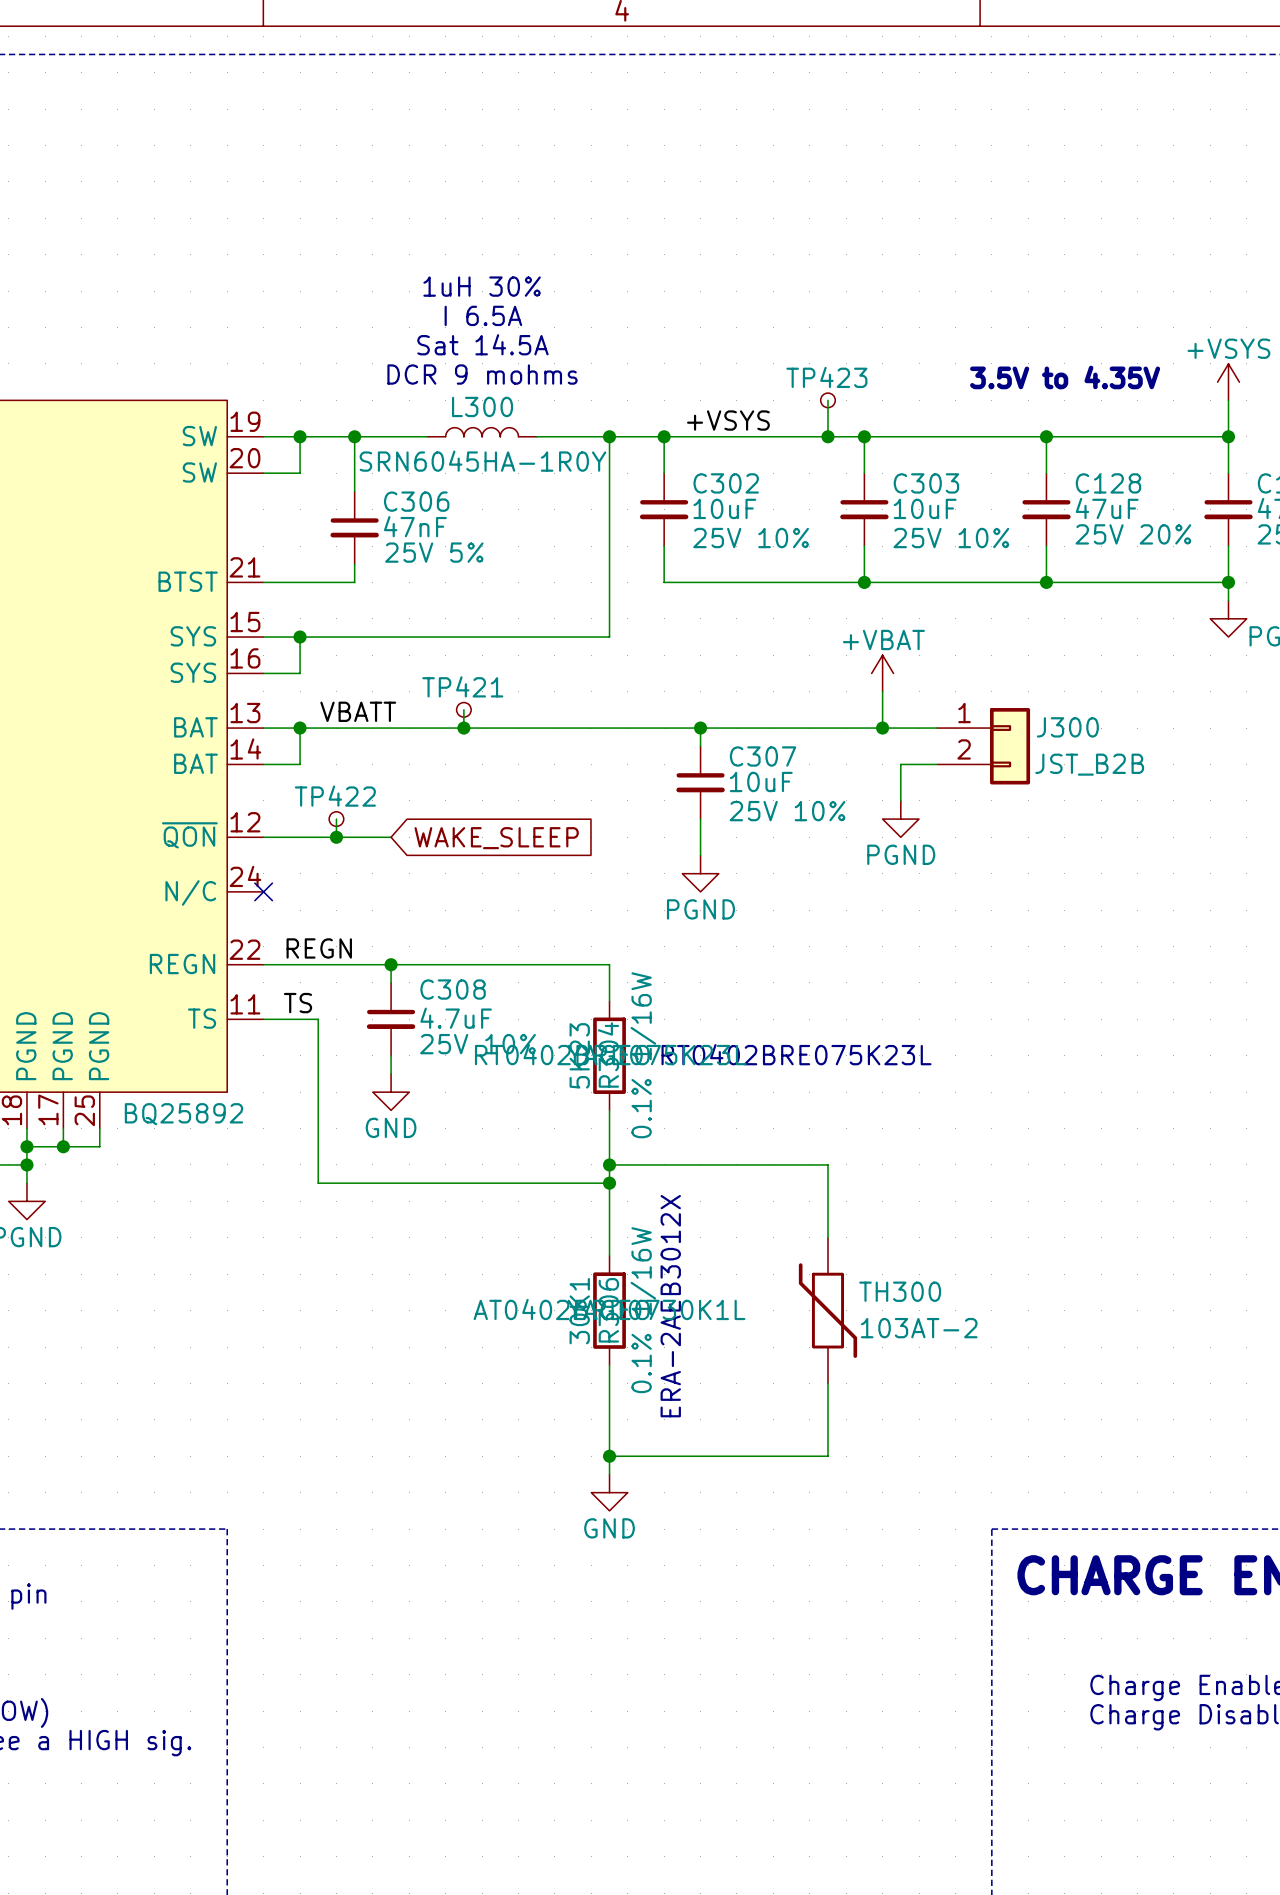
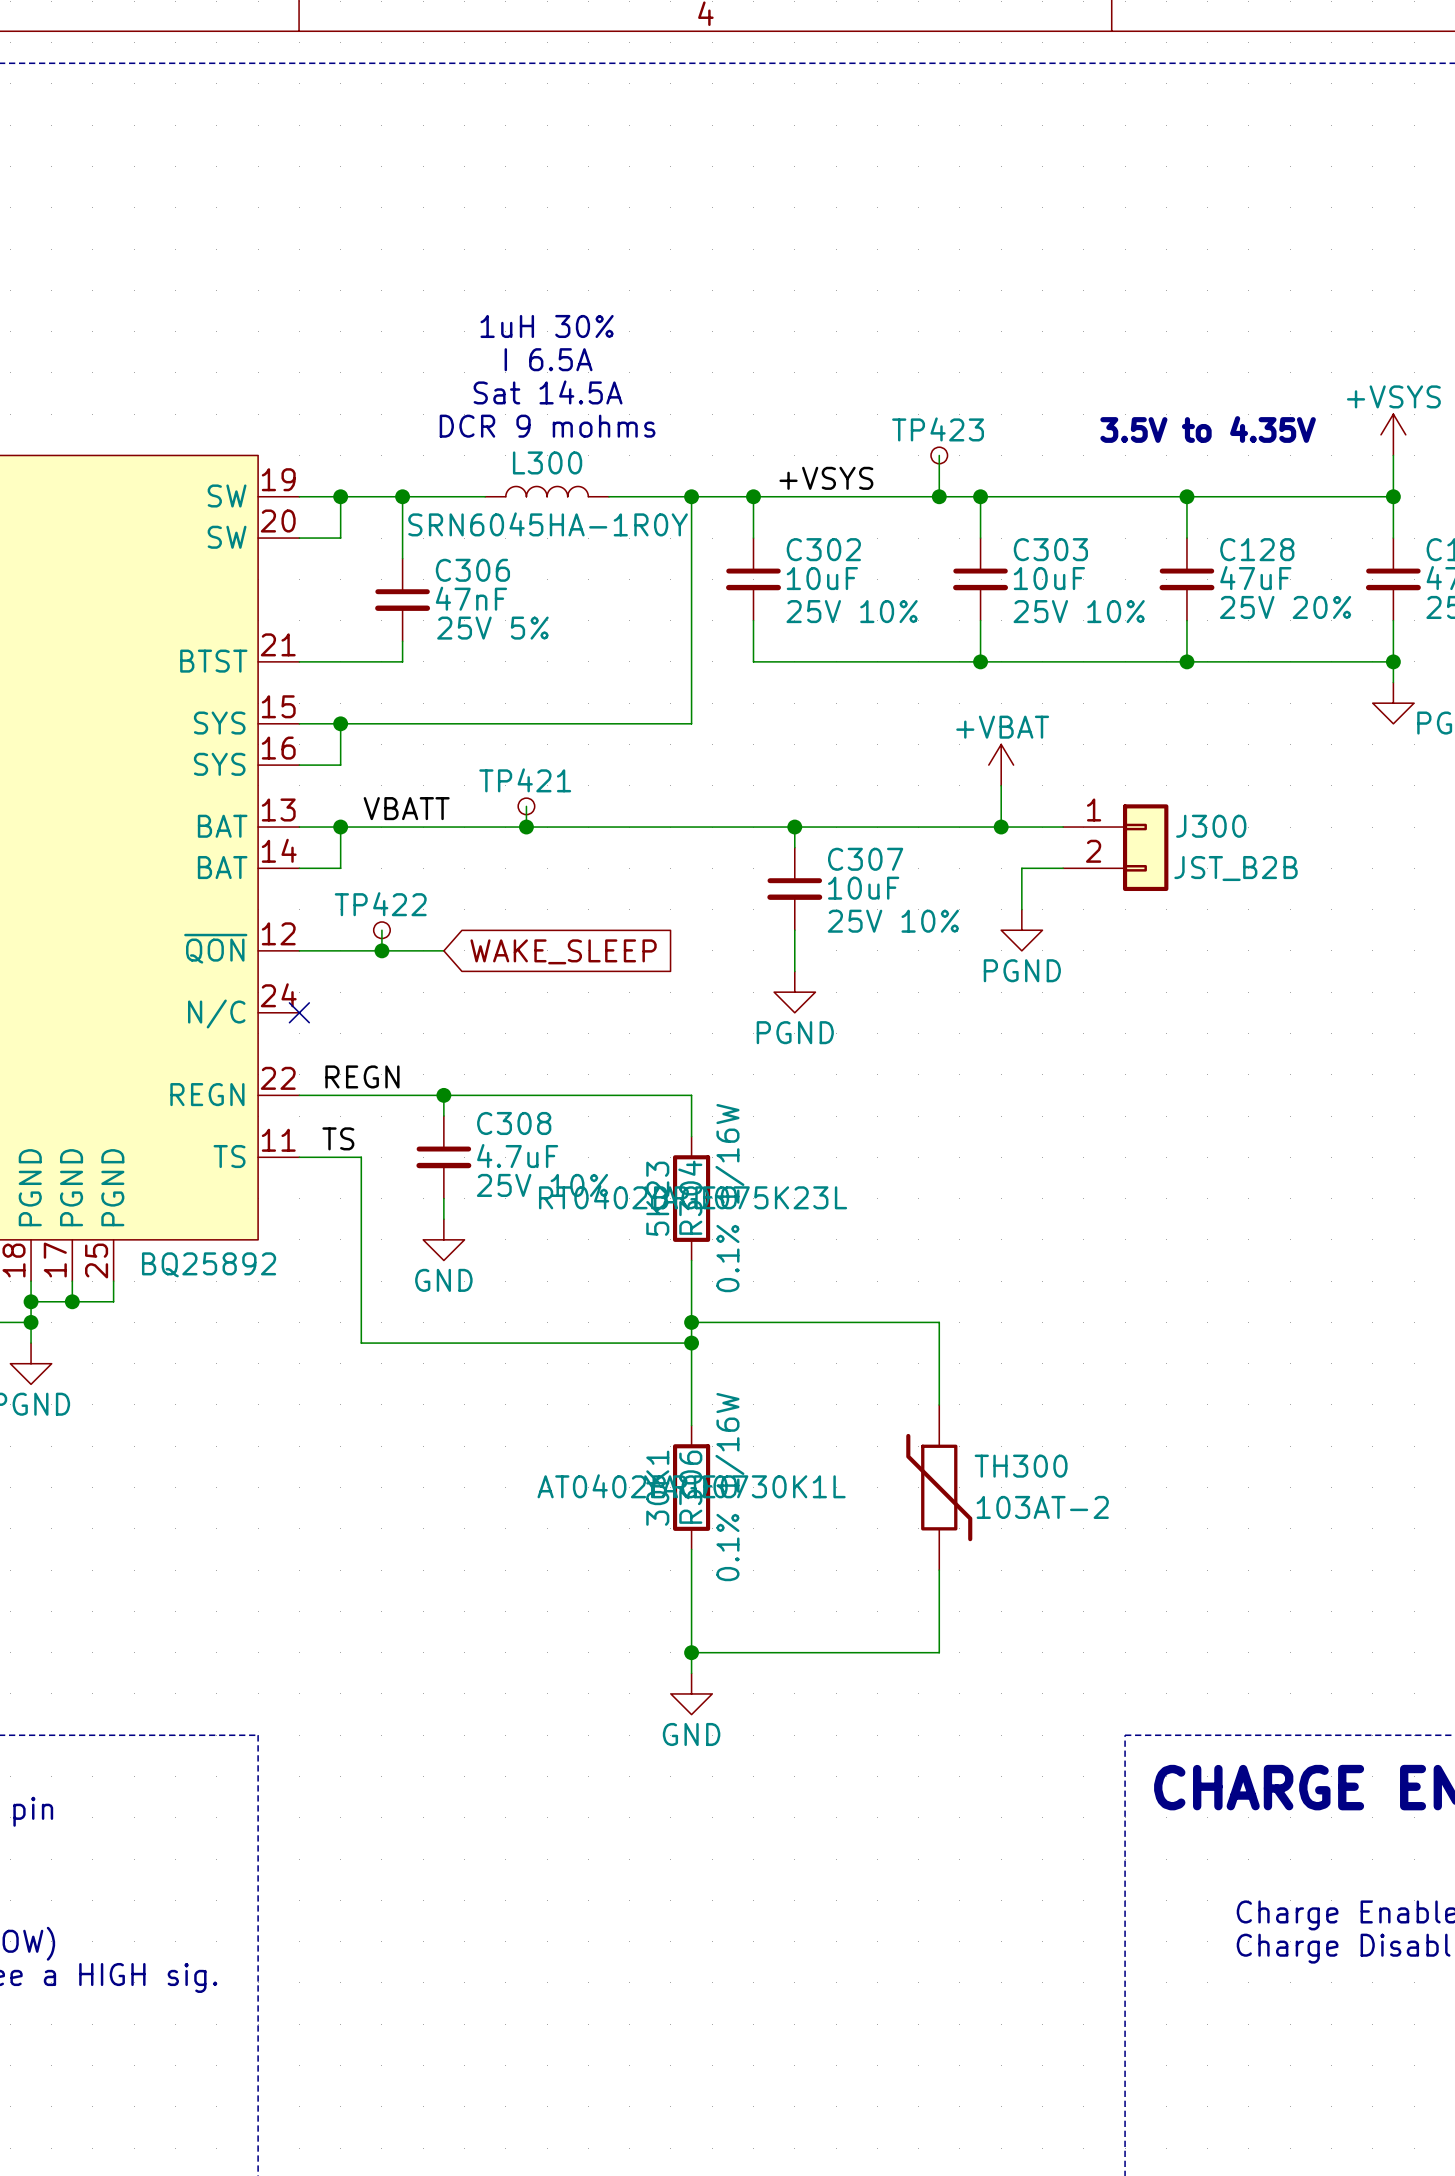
text: RT0402BRE075K23L (796, 1054) -> none
text: ERA-2AEB3012X (670, 1306) -> none

